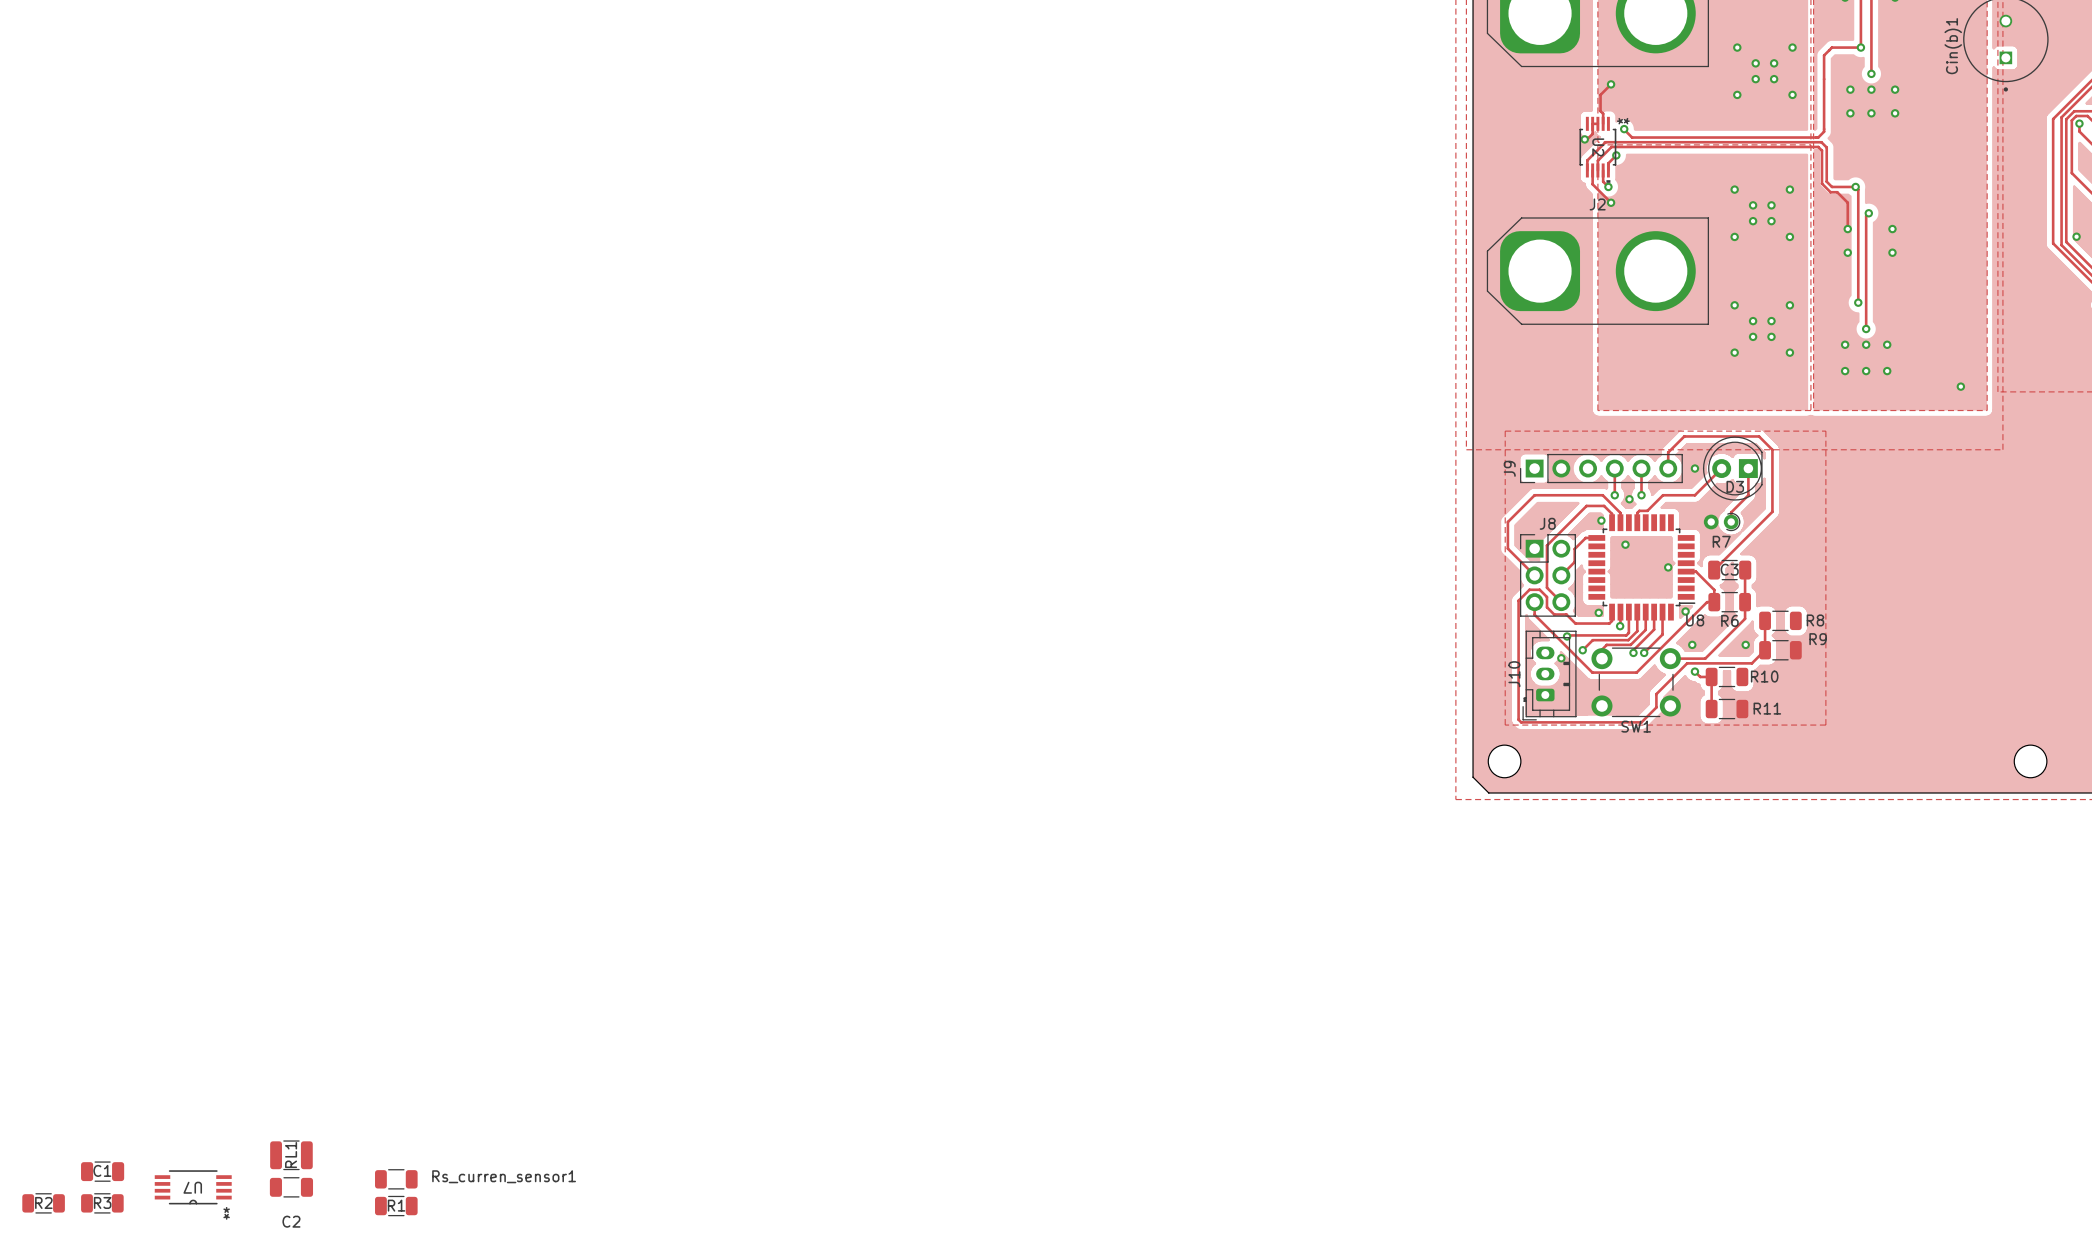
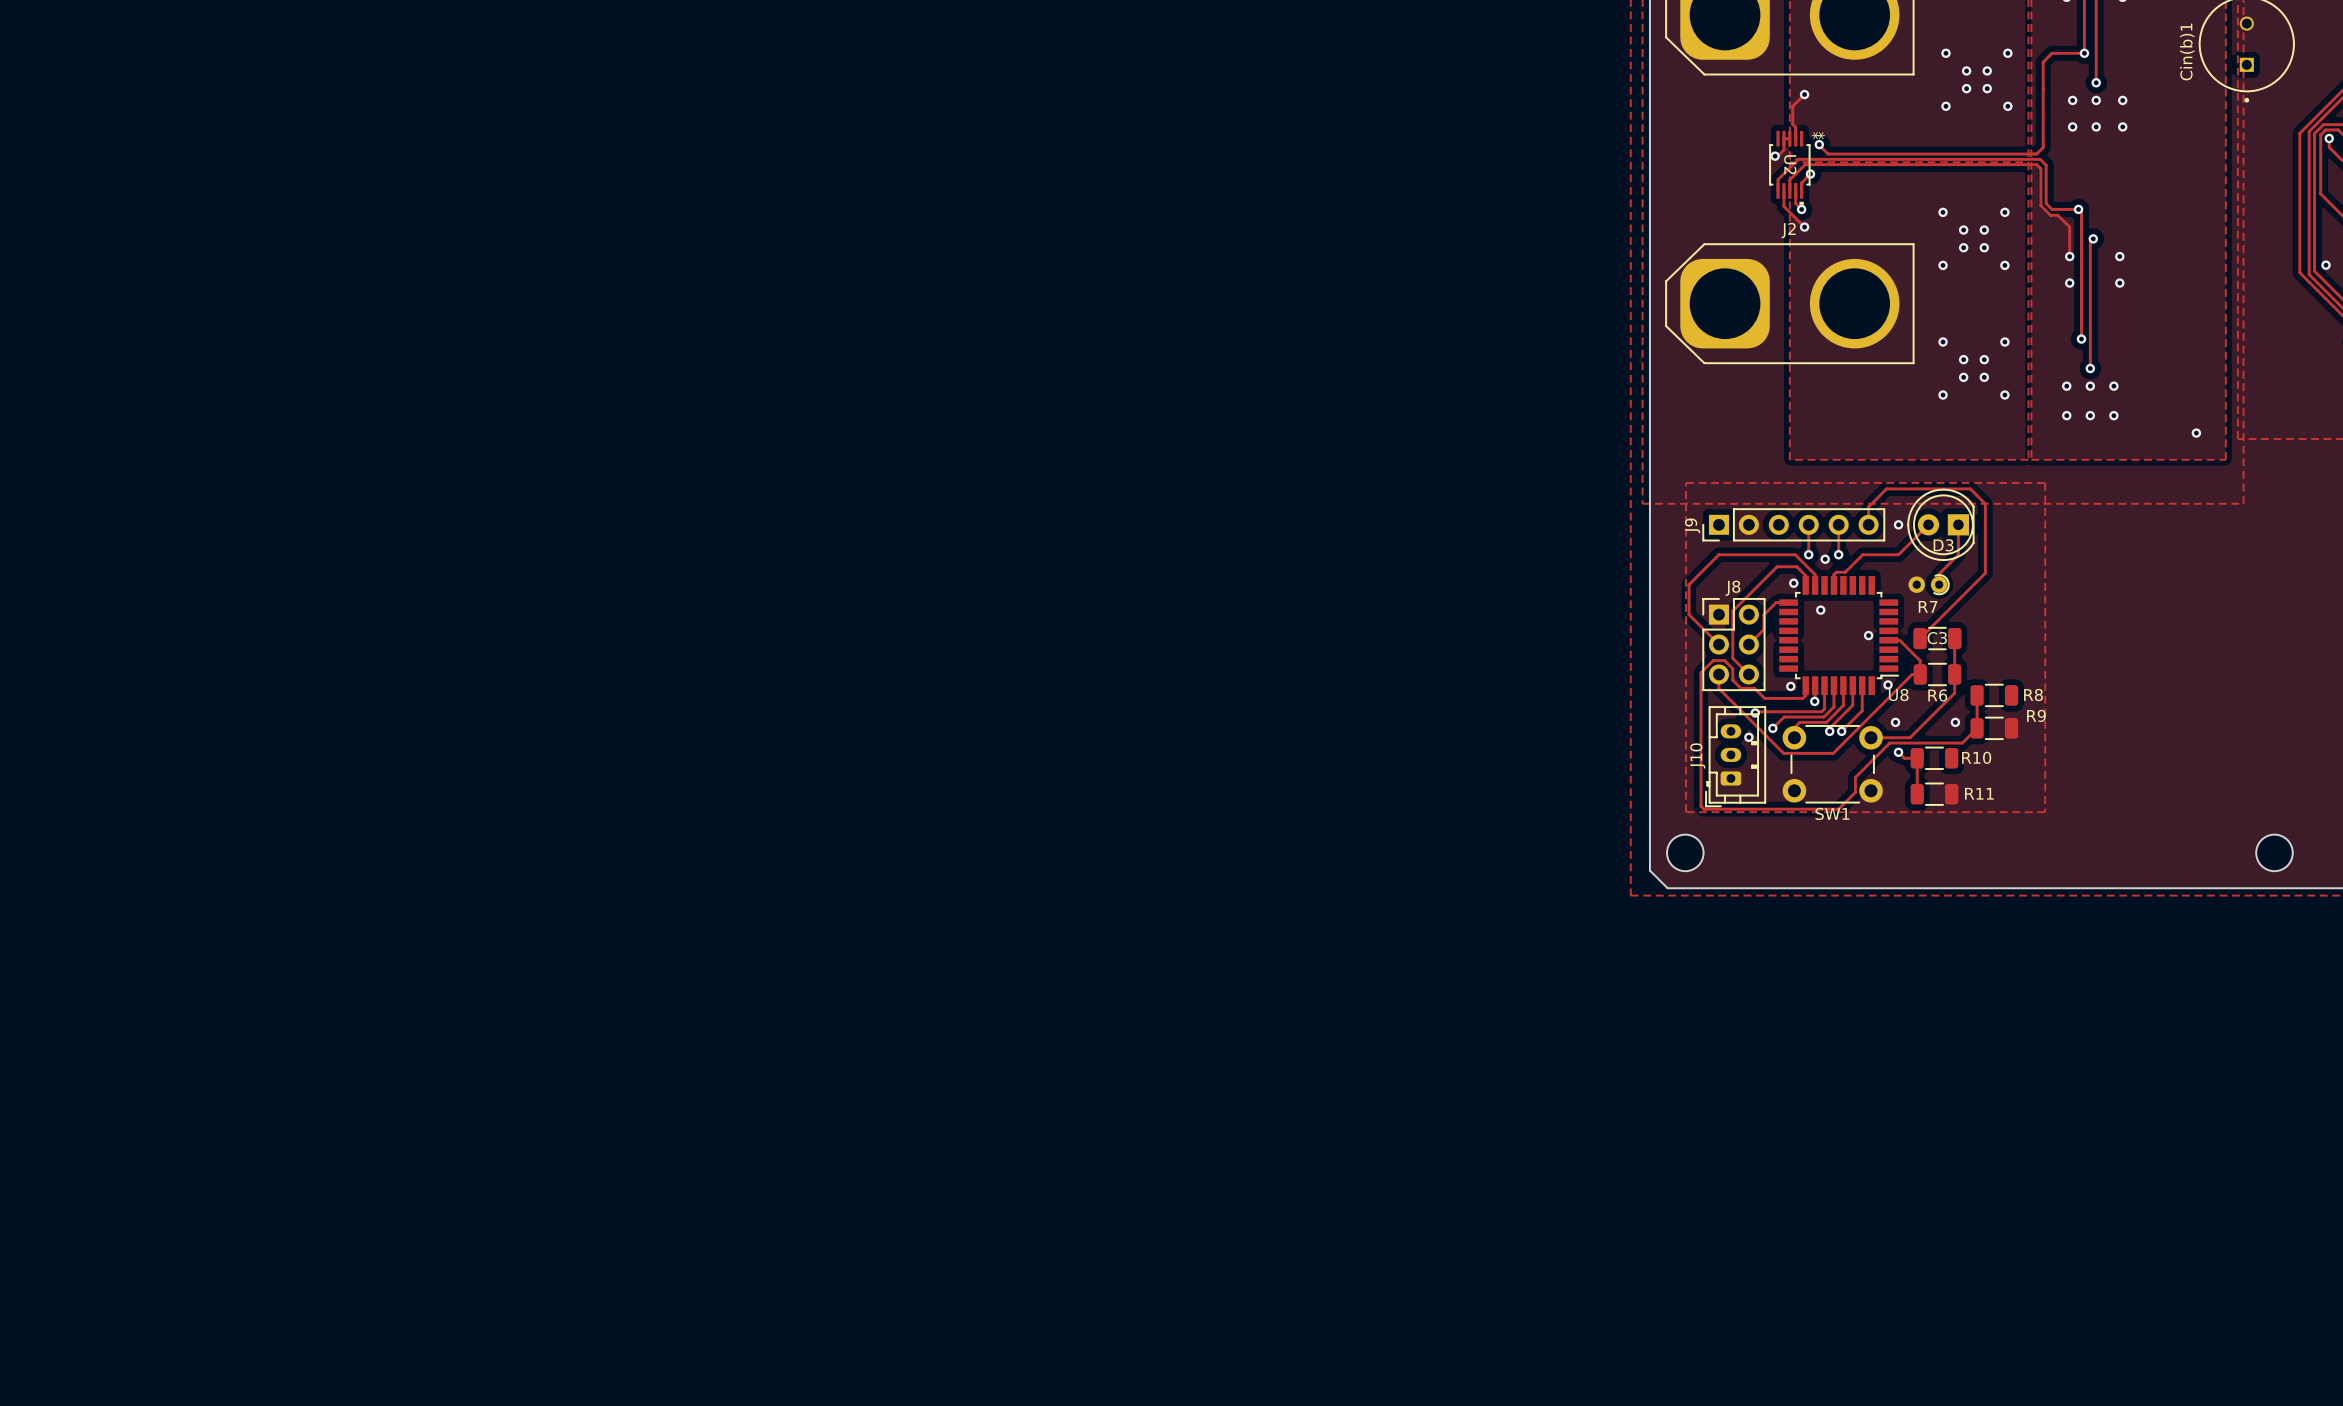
RL1: (291, 1155) -> none
C1: (102, 1171) -> none
Rs_curren_sensor1: (396, 1179) -> none
U7: (193, 1187) -> none
C2: (291, 1187) -> none
R2: (43, 1203) -> none
R3: (102, 1203) -> none
R1: (396, 1206) -> none

